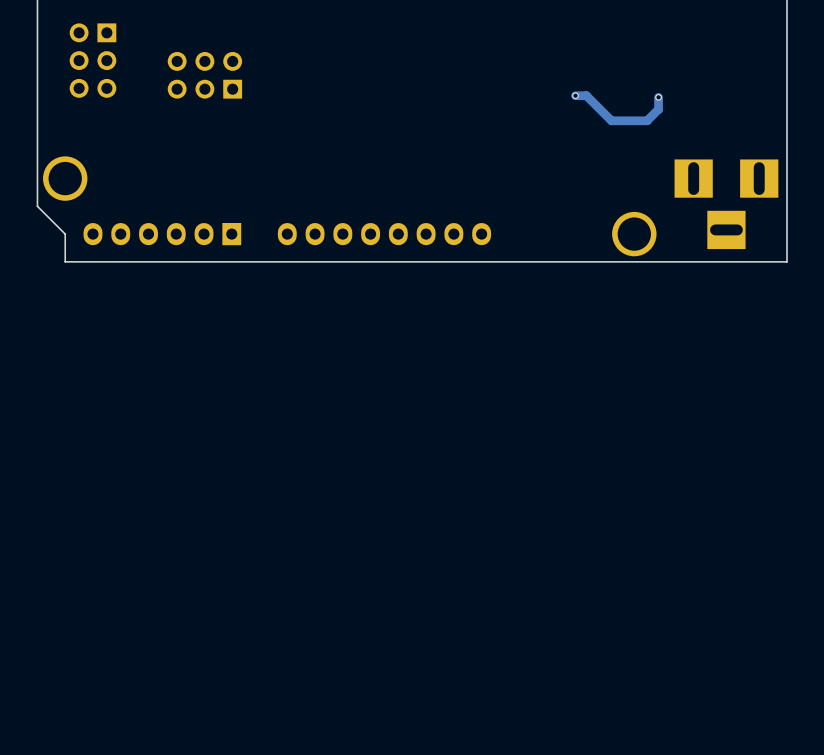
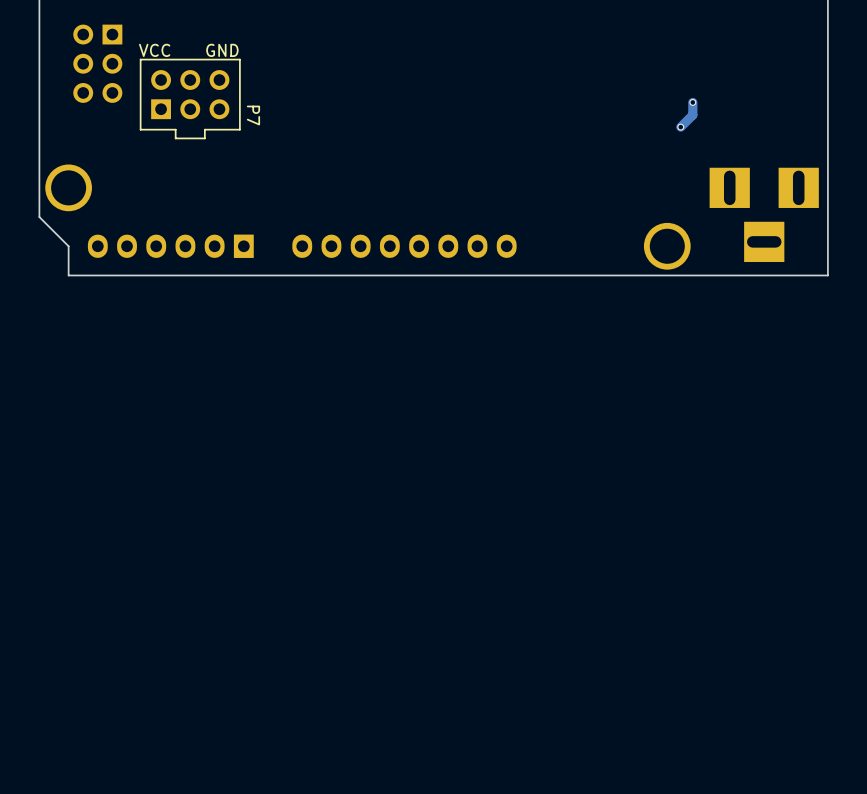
P7 side: top (204, 75) -> bottom (190, 99)
track: (575, 95) (586, 95) (611, 120) (647, 120) -> none
via: (575, 95) -> none
via: none -> (680, 127)

